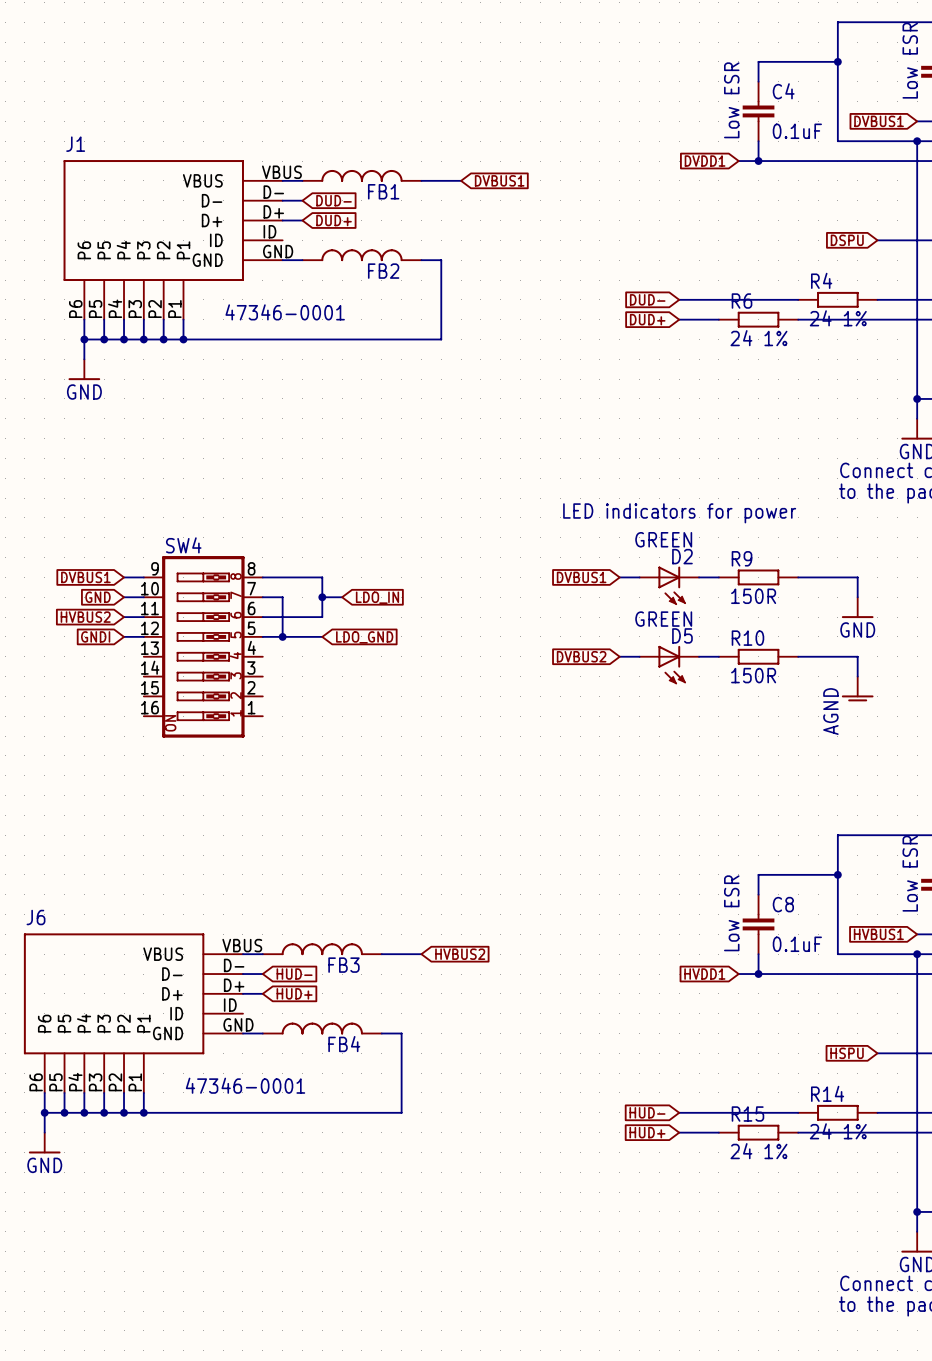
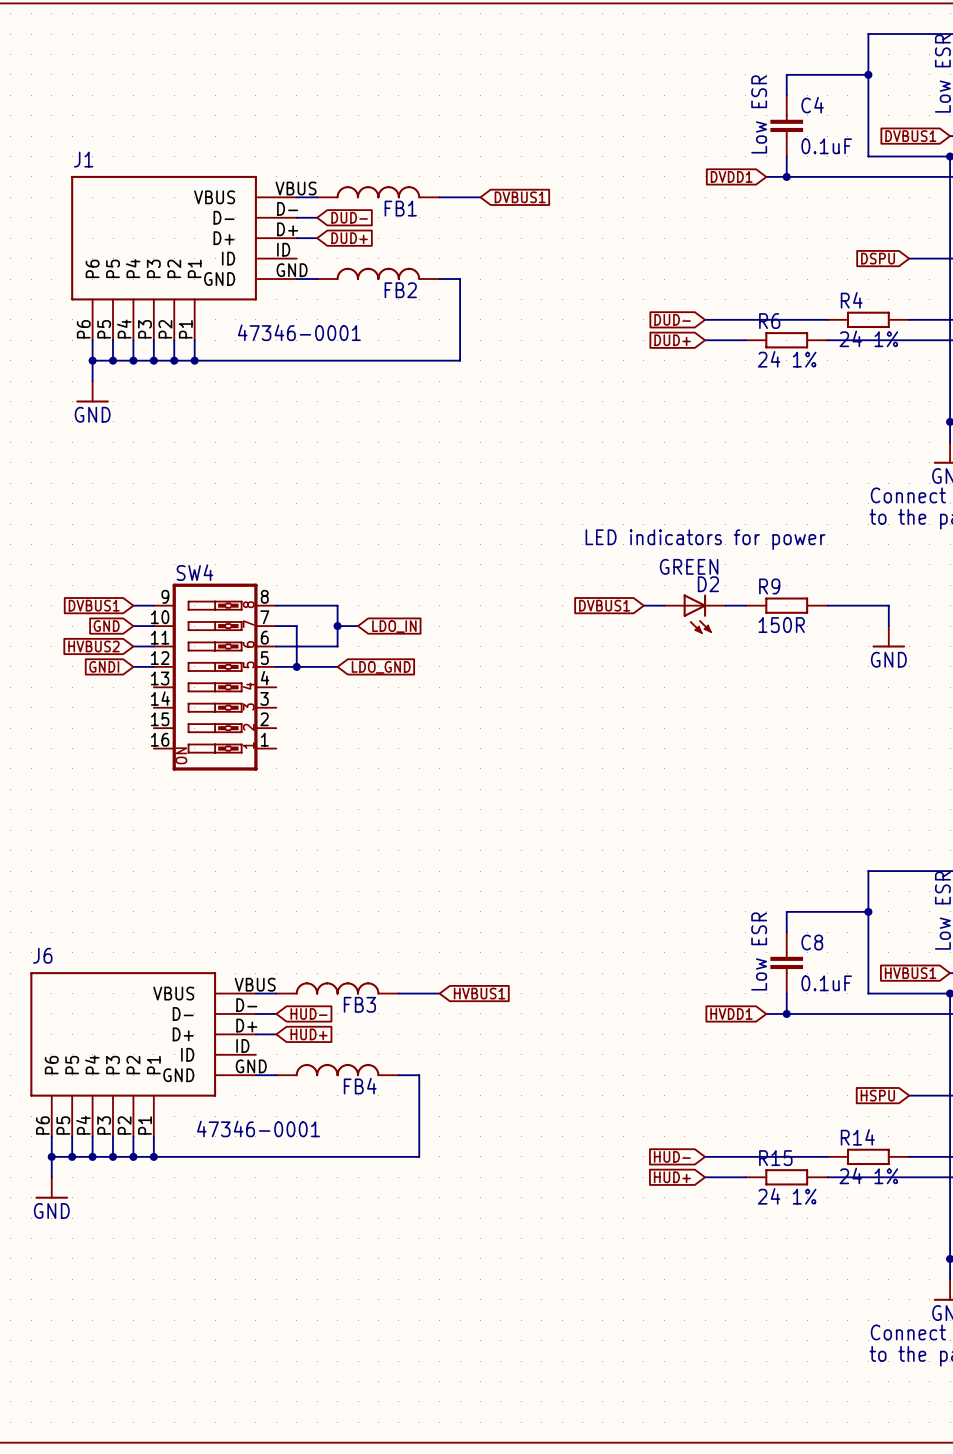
global label: DVBUS2 (581, 656) -> none
wire: (619, 656) (639, 656) -> none
wire: (699, 656) (718, 656) -> none
R10: 150R (758, 656) -> none
wire: (798, 656) (857, 656) (857, 676) -> none
D5: GREEN (669, 664) -> none
power symbol: AGND (857, 688) -> none
global label: HVBUS2 (460, 954) -> HVBUS1 (479, 993)

